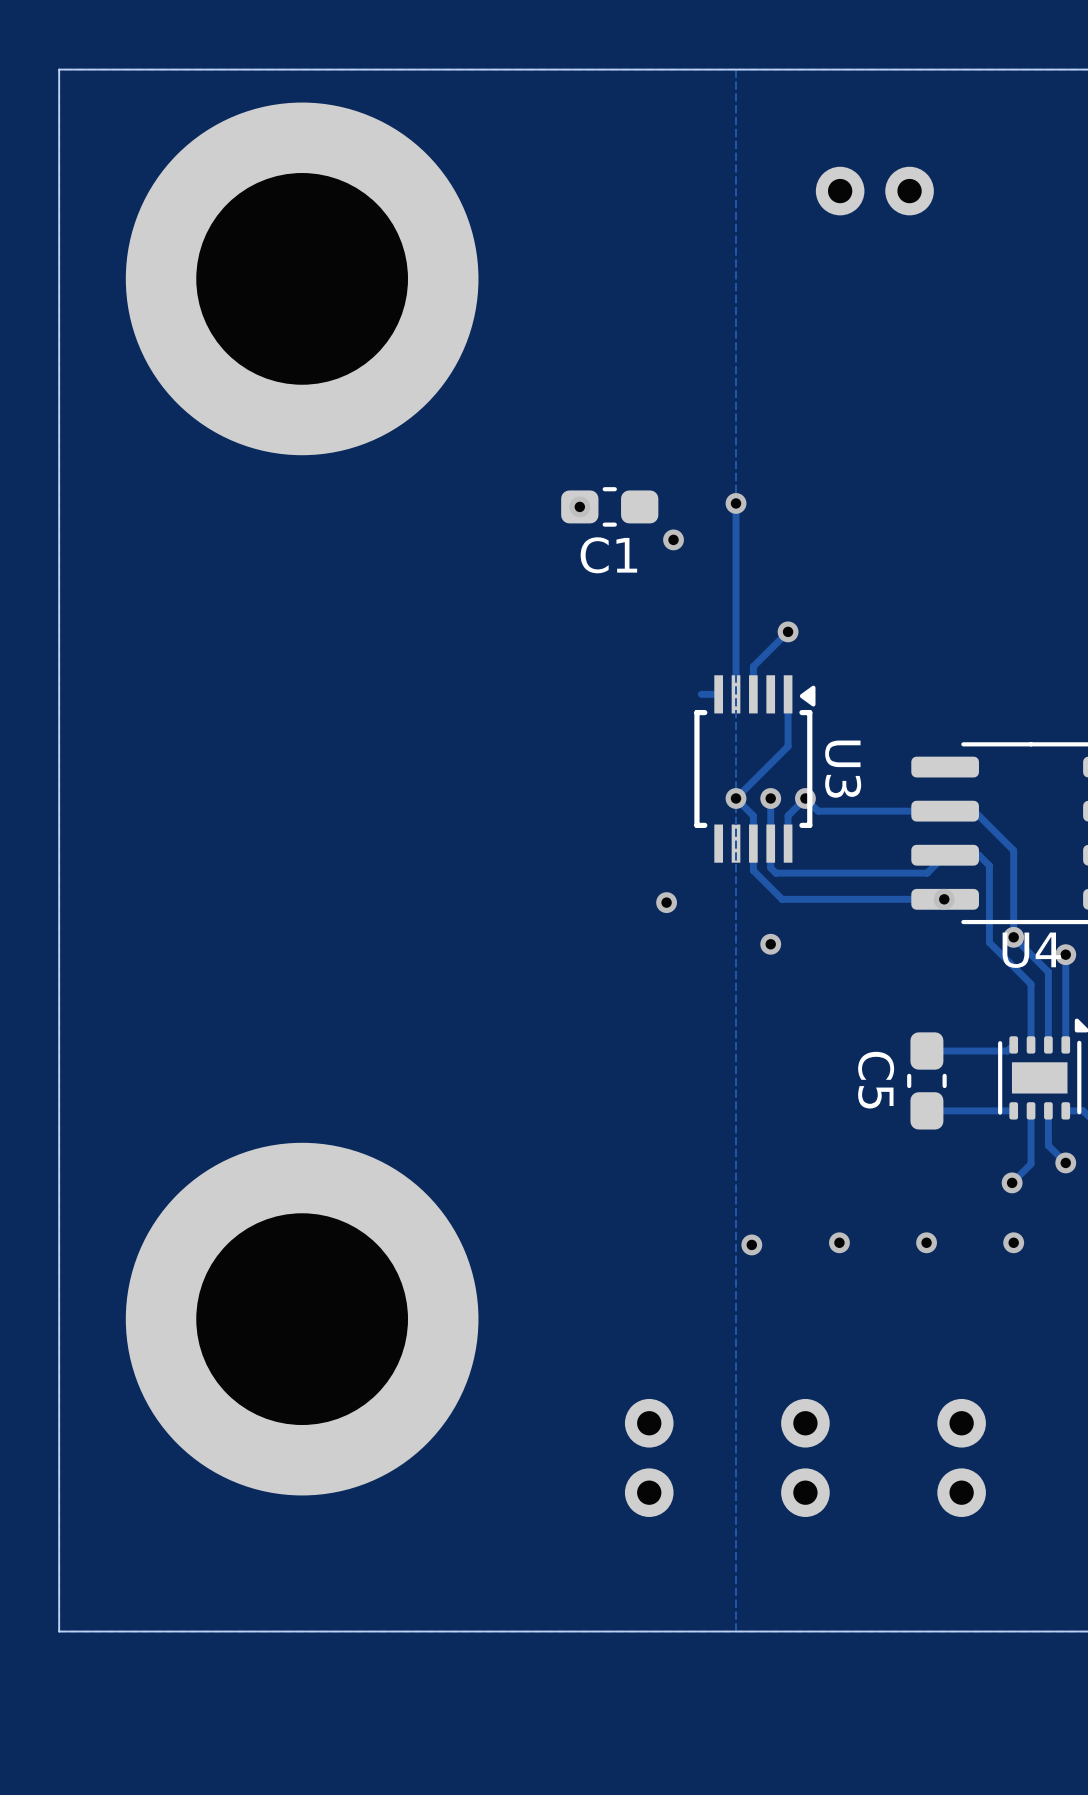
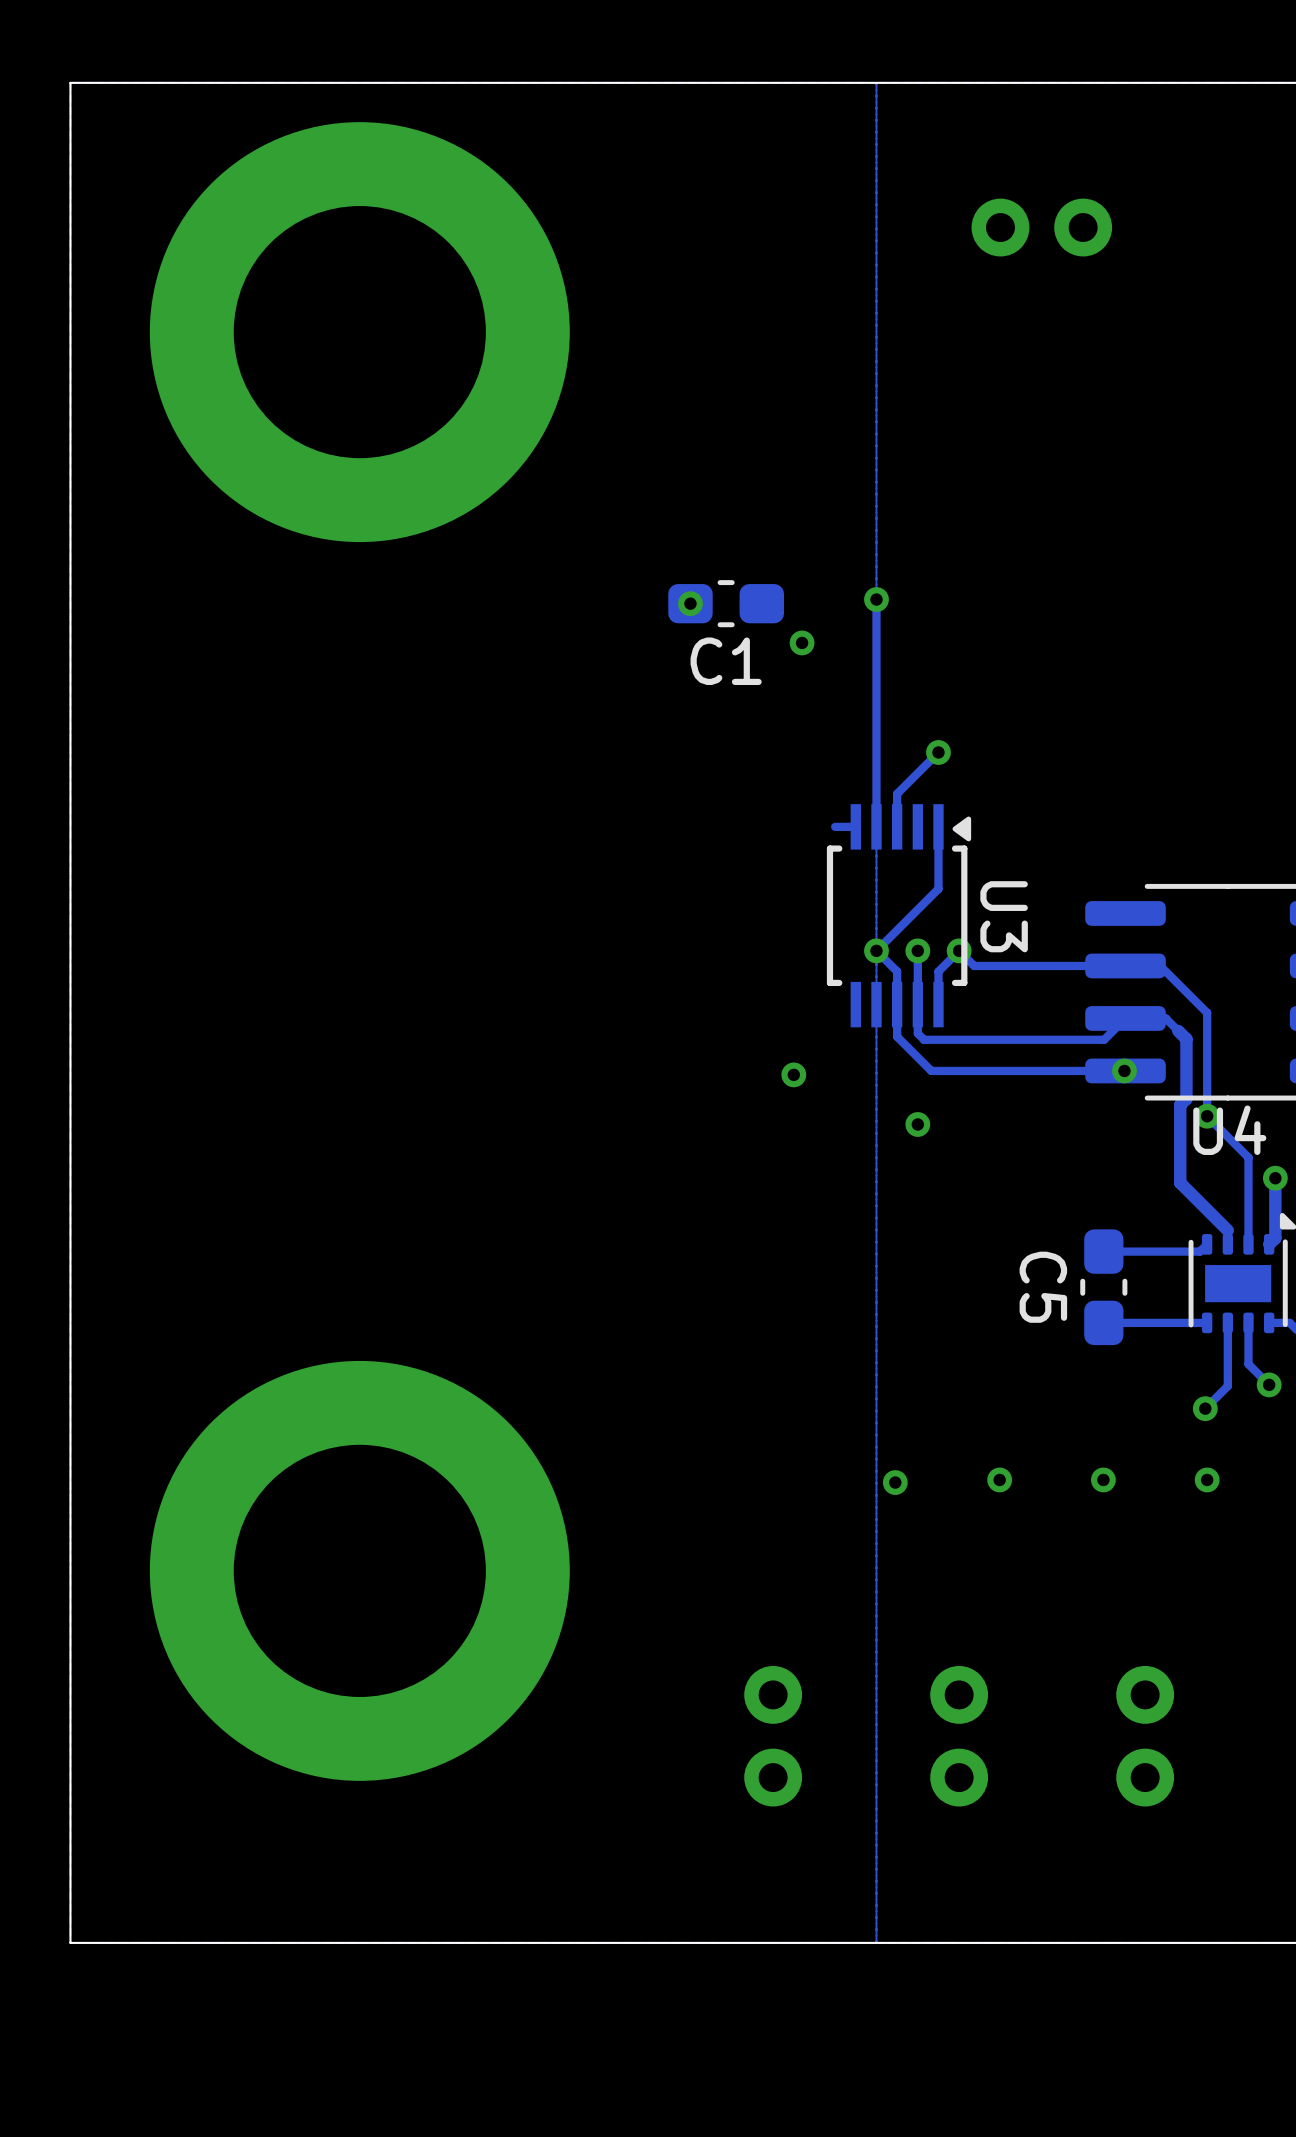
track: (989, 865) (989, 942) (1031, 984) (1031, 1033) -> (1178, 1030) (1186, 1039) (1186, 1098) (1180, 1105) (1180, 1182) (1227, 1230)
track: (1065, 954) (1065, 1044) -> (1275, 1178) (1275, 1238) (1269, 1244)
via position: (1065, 954) -> (1275, 1178)

